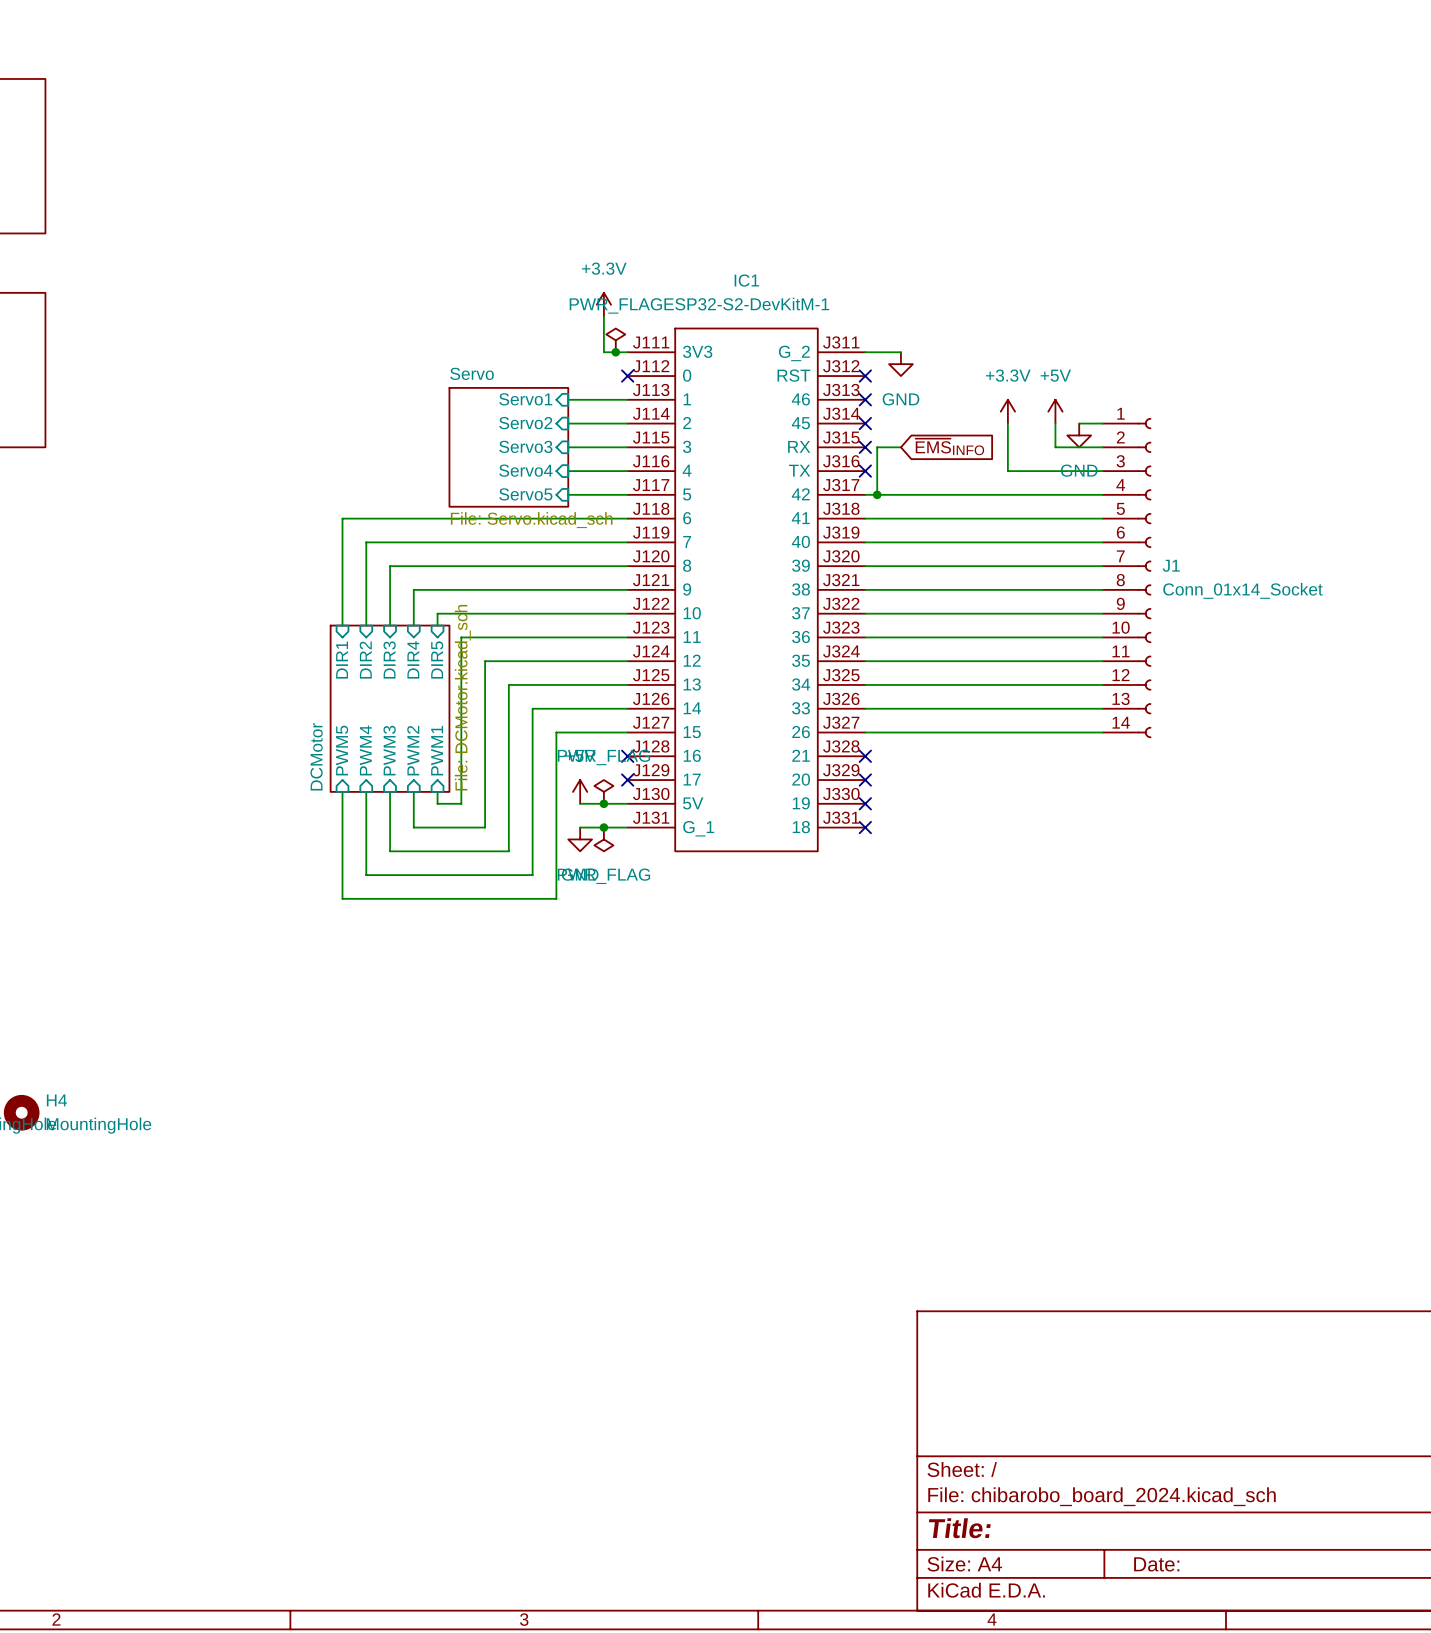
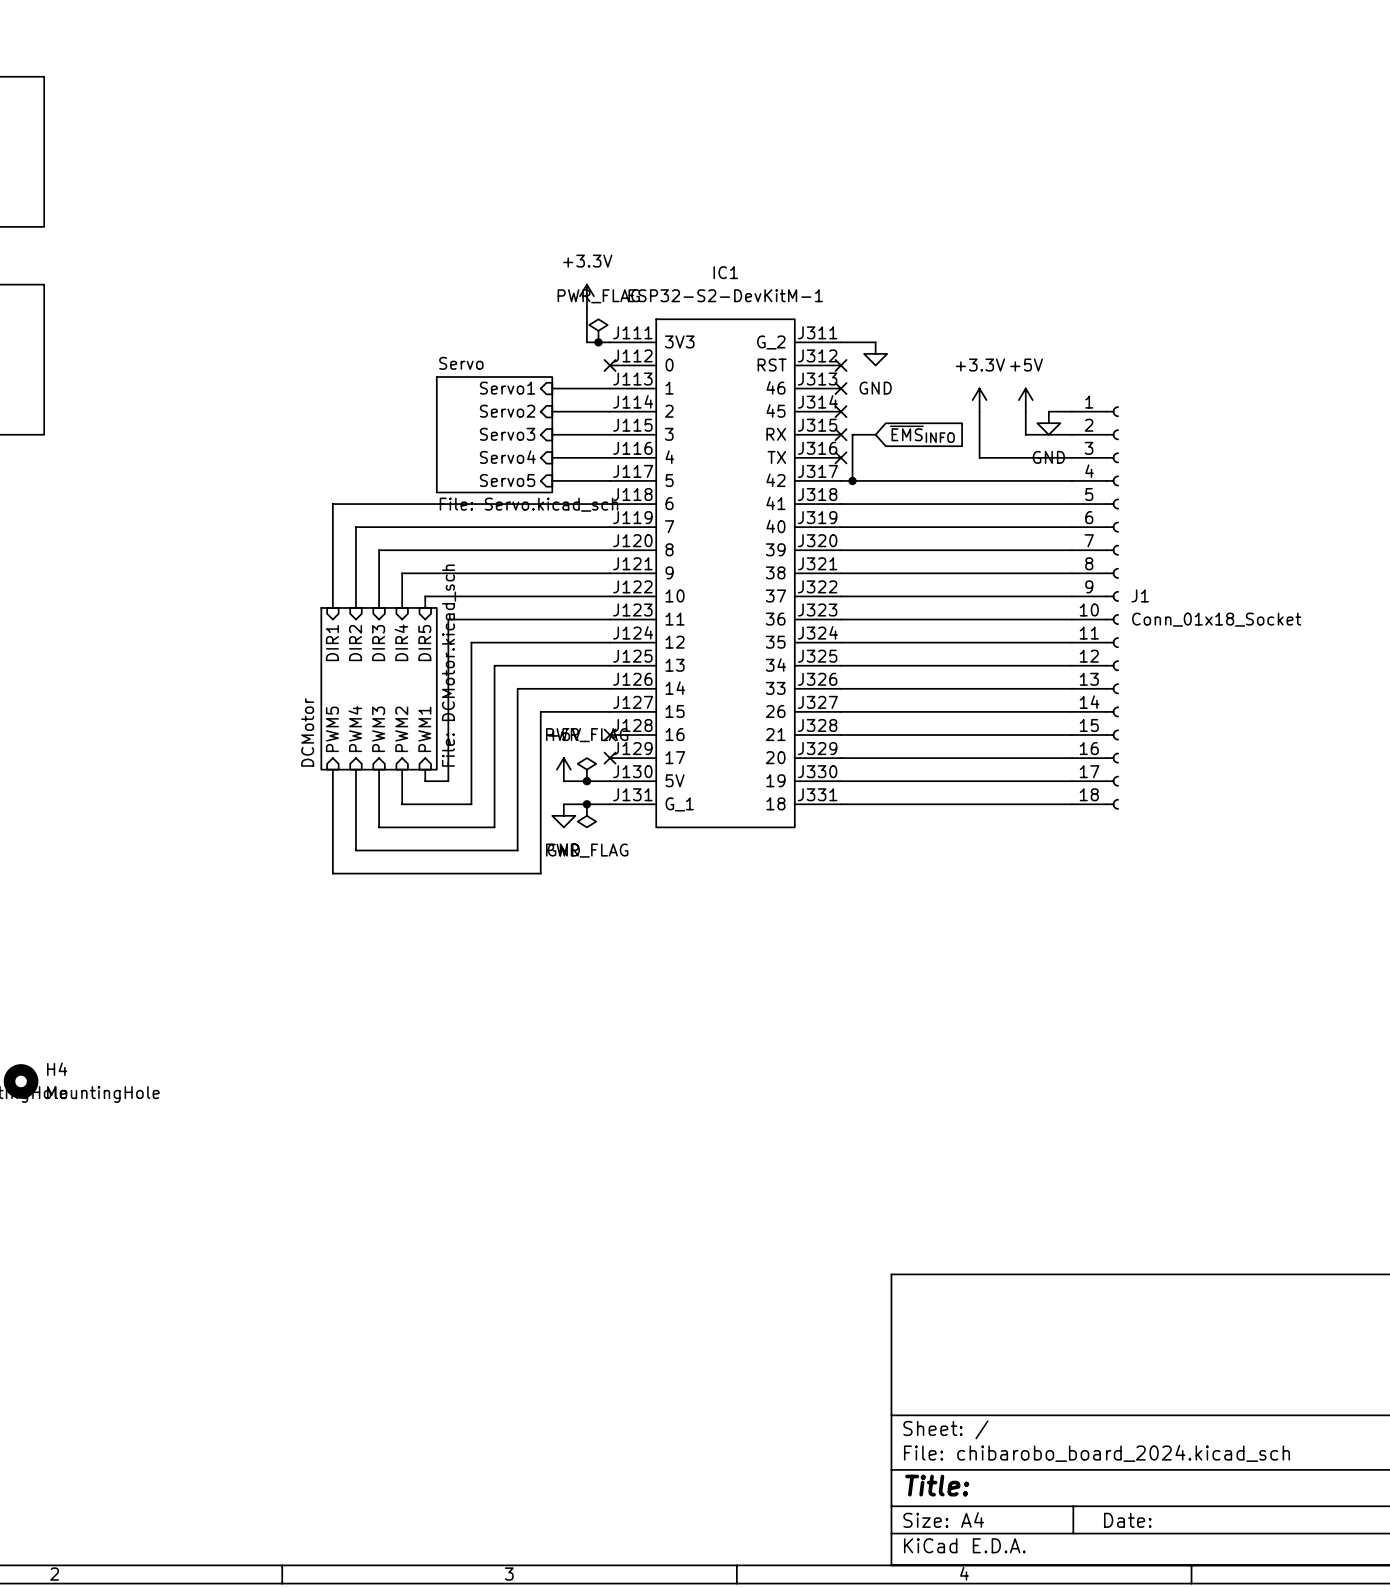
J1 symbol: [1102, 418, 1152, 738] -> [1071, 406, 1119, 810]
J1 value: Conn_01x14_Socket (1242, 590) -> Conn_01x18_Socket (1216, 619)
wire: none -> (840, 735) (1071, 735)
no-connect mark: (865, 756) -> none
wire: none -> (840, 758) (1071, 758)
no-connect mark: (865, 780) -> none
wire: none -> (840, 781) (1071, 781)
no-connect mark: (865, 803) -> none
wire: none -> (840, 804) (1071, 804)
no-connect mark: (865, 827) -> none

